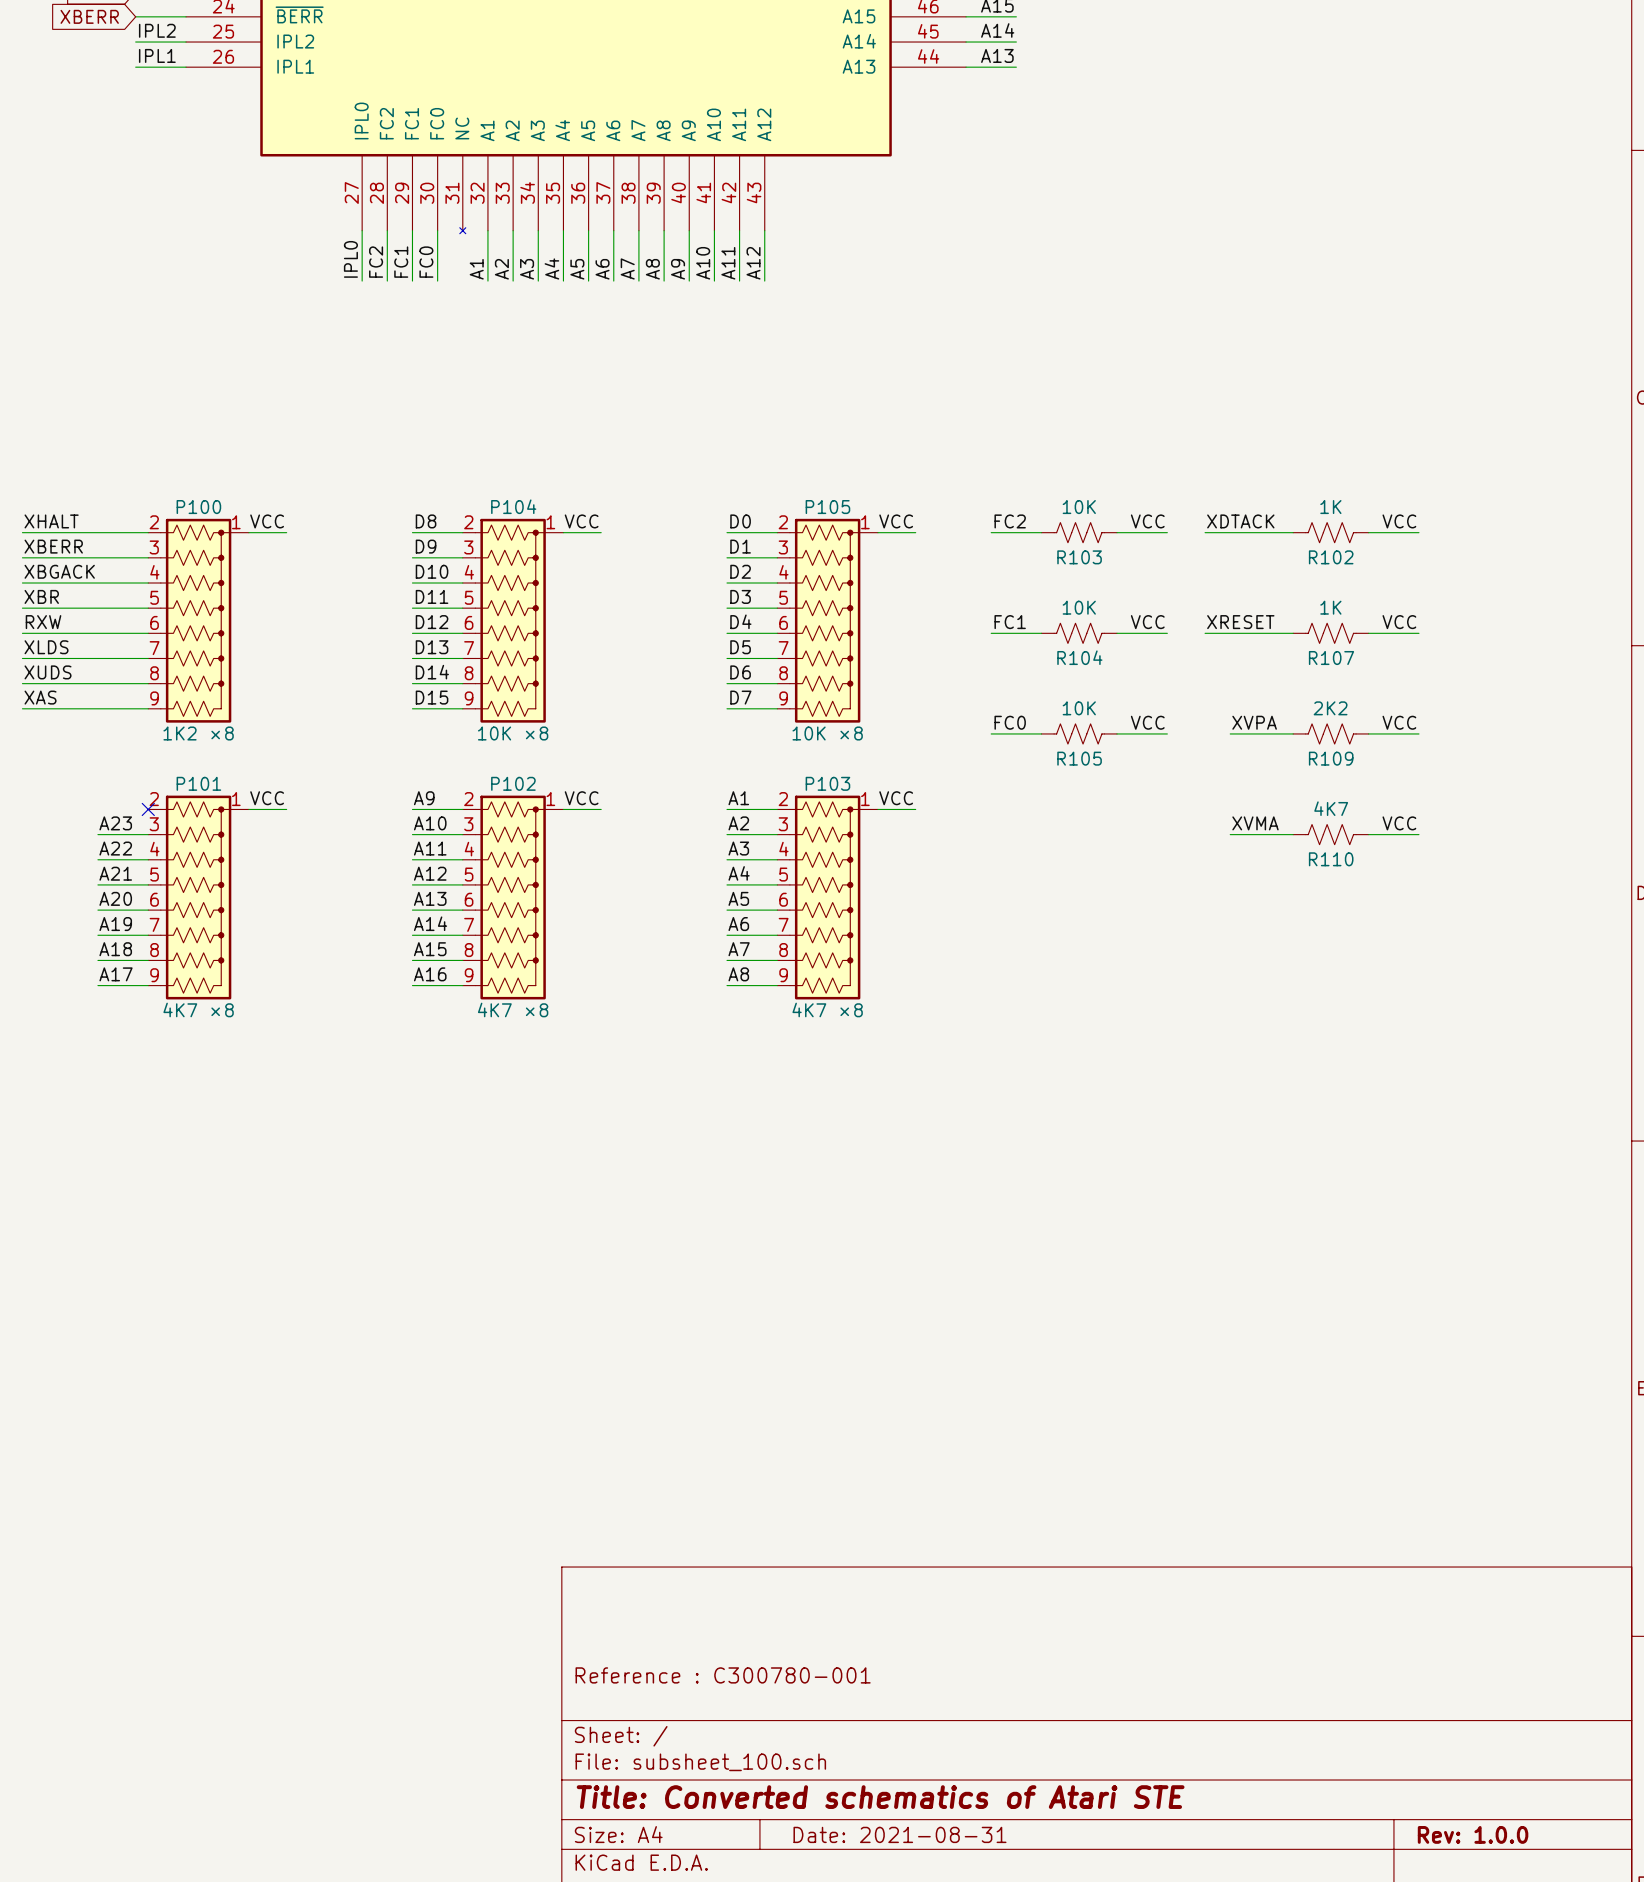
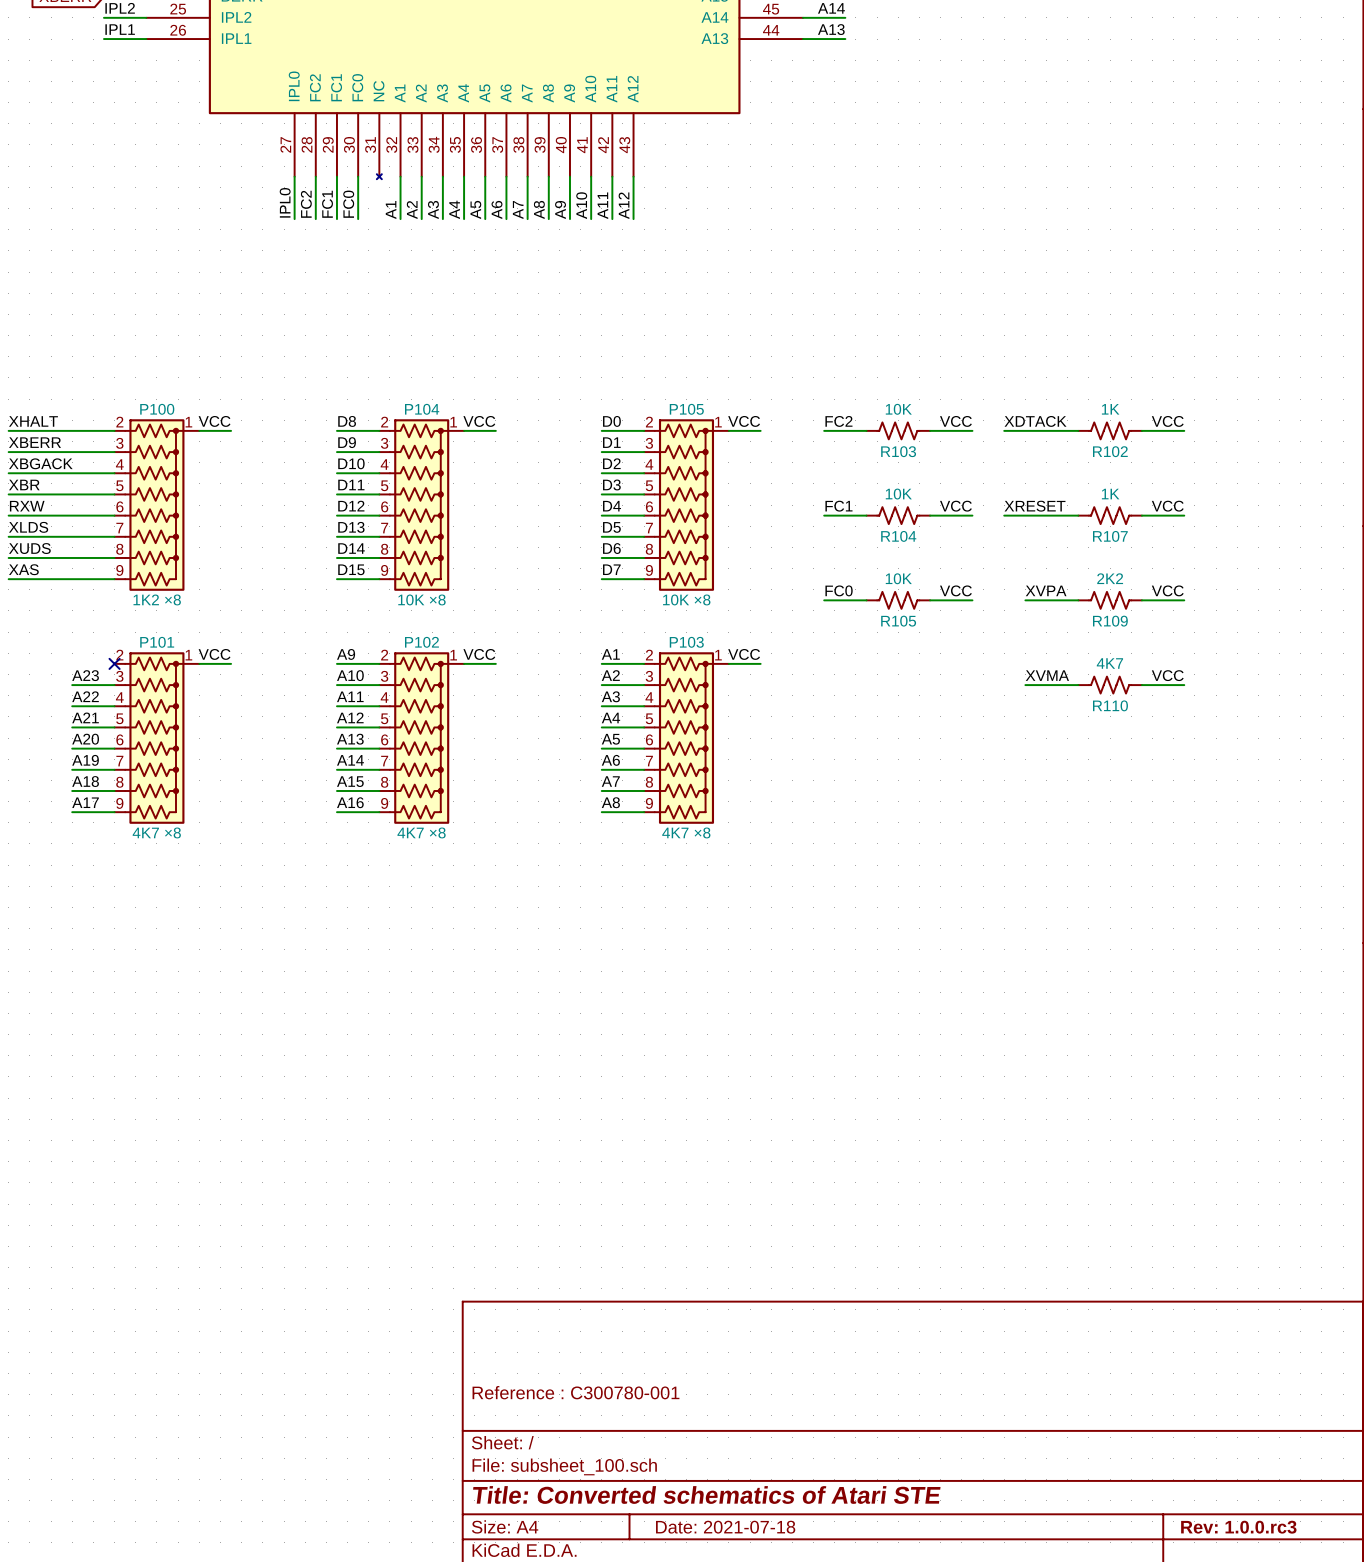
title block: Date: 2021-08-31 (899, 1834) -> Date: 2021-07-18 (725, 1527)
title block: Rev: 1.0.0 (1473, 1834) -> Rev: 1.0.0.rc3 (1238, 1527)

